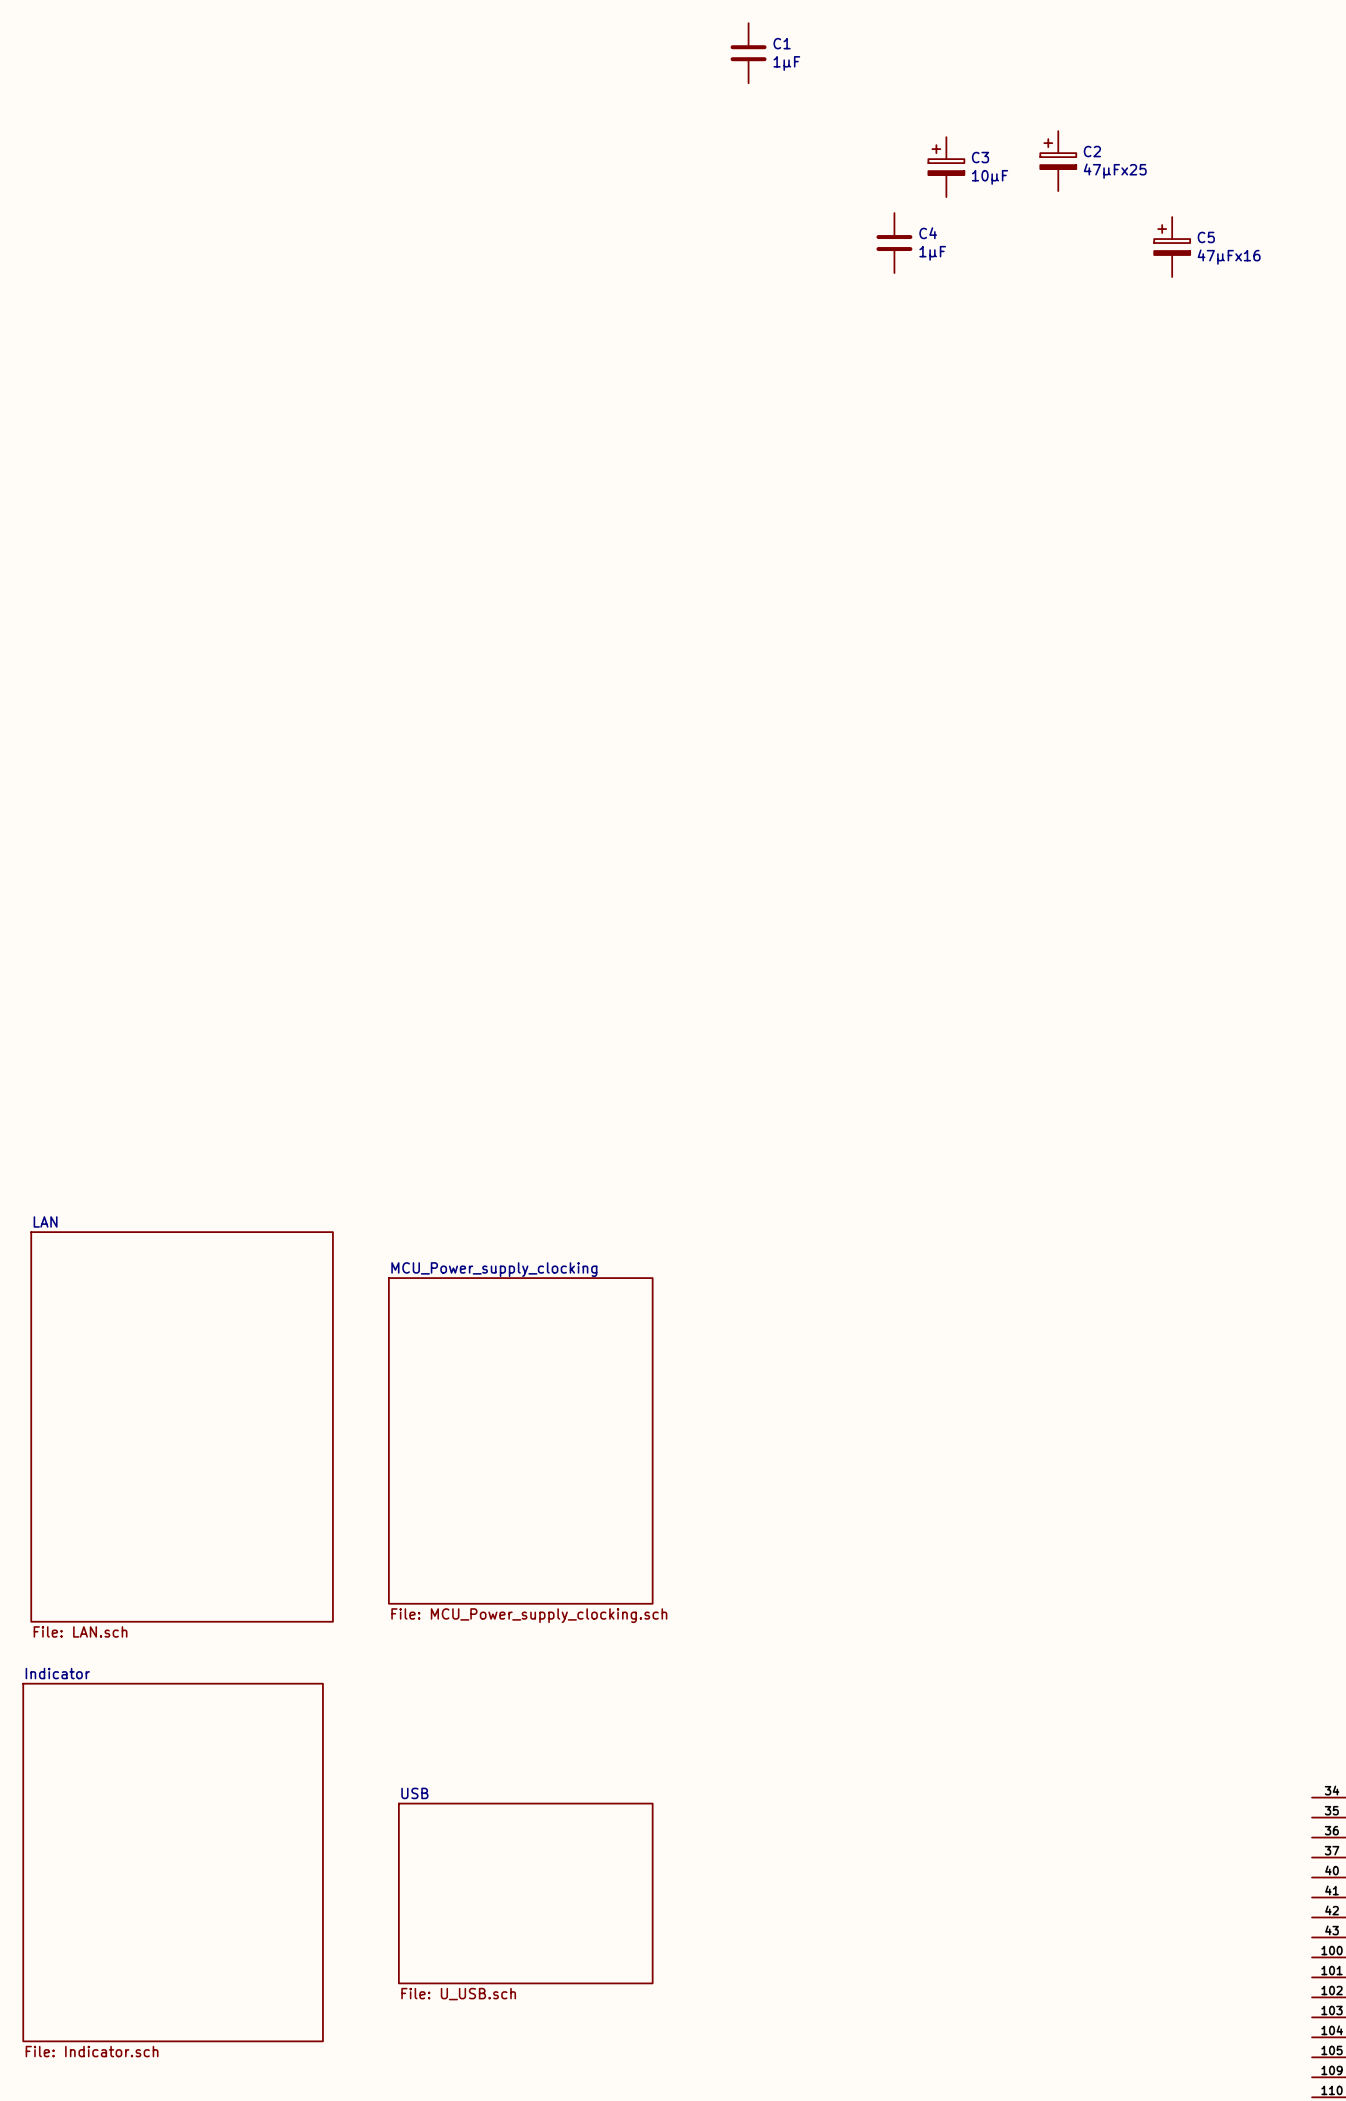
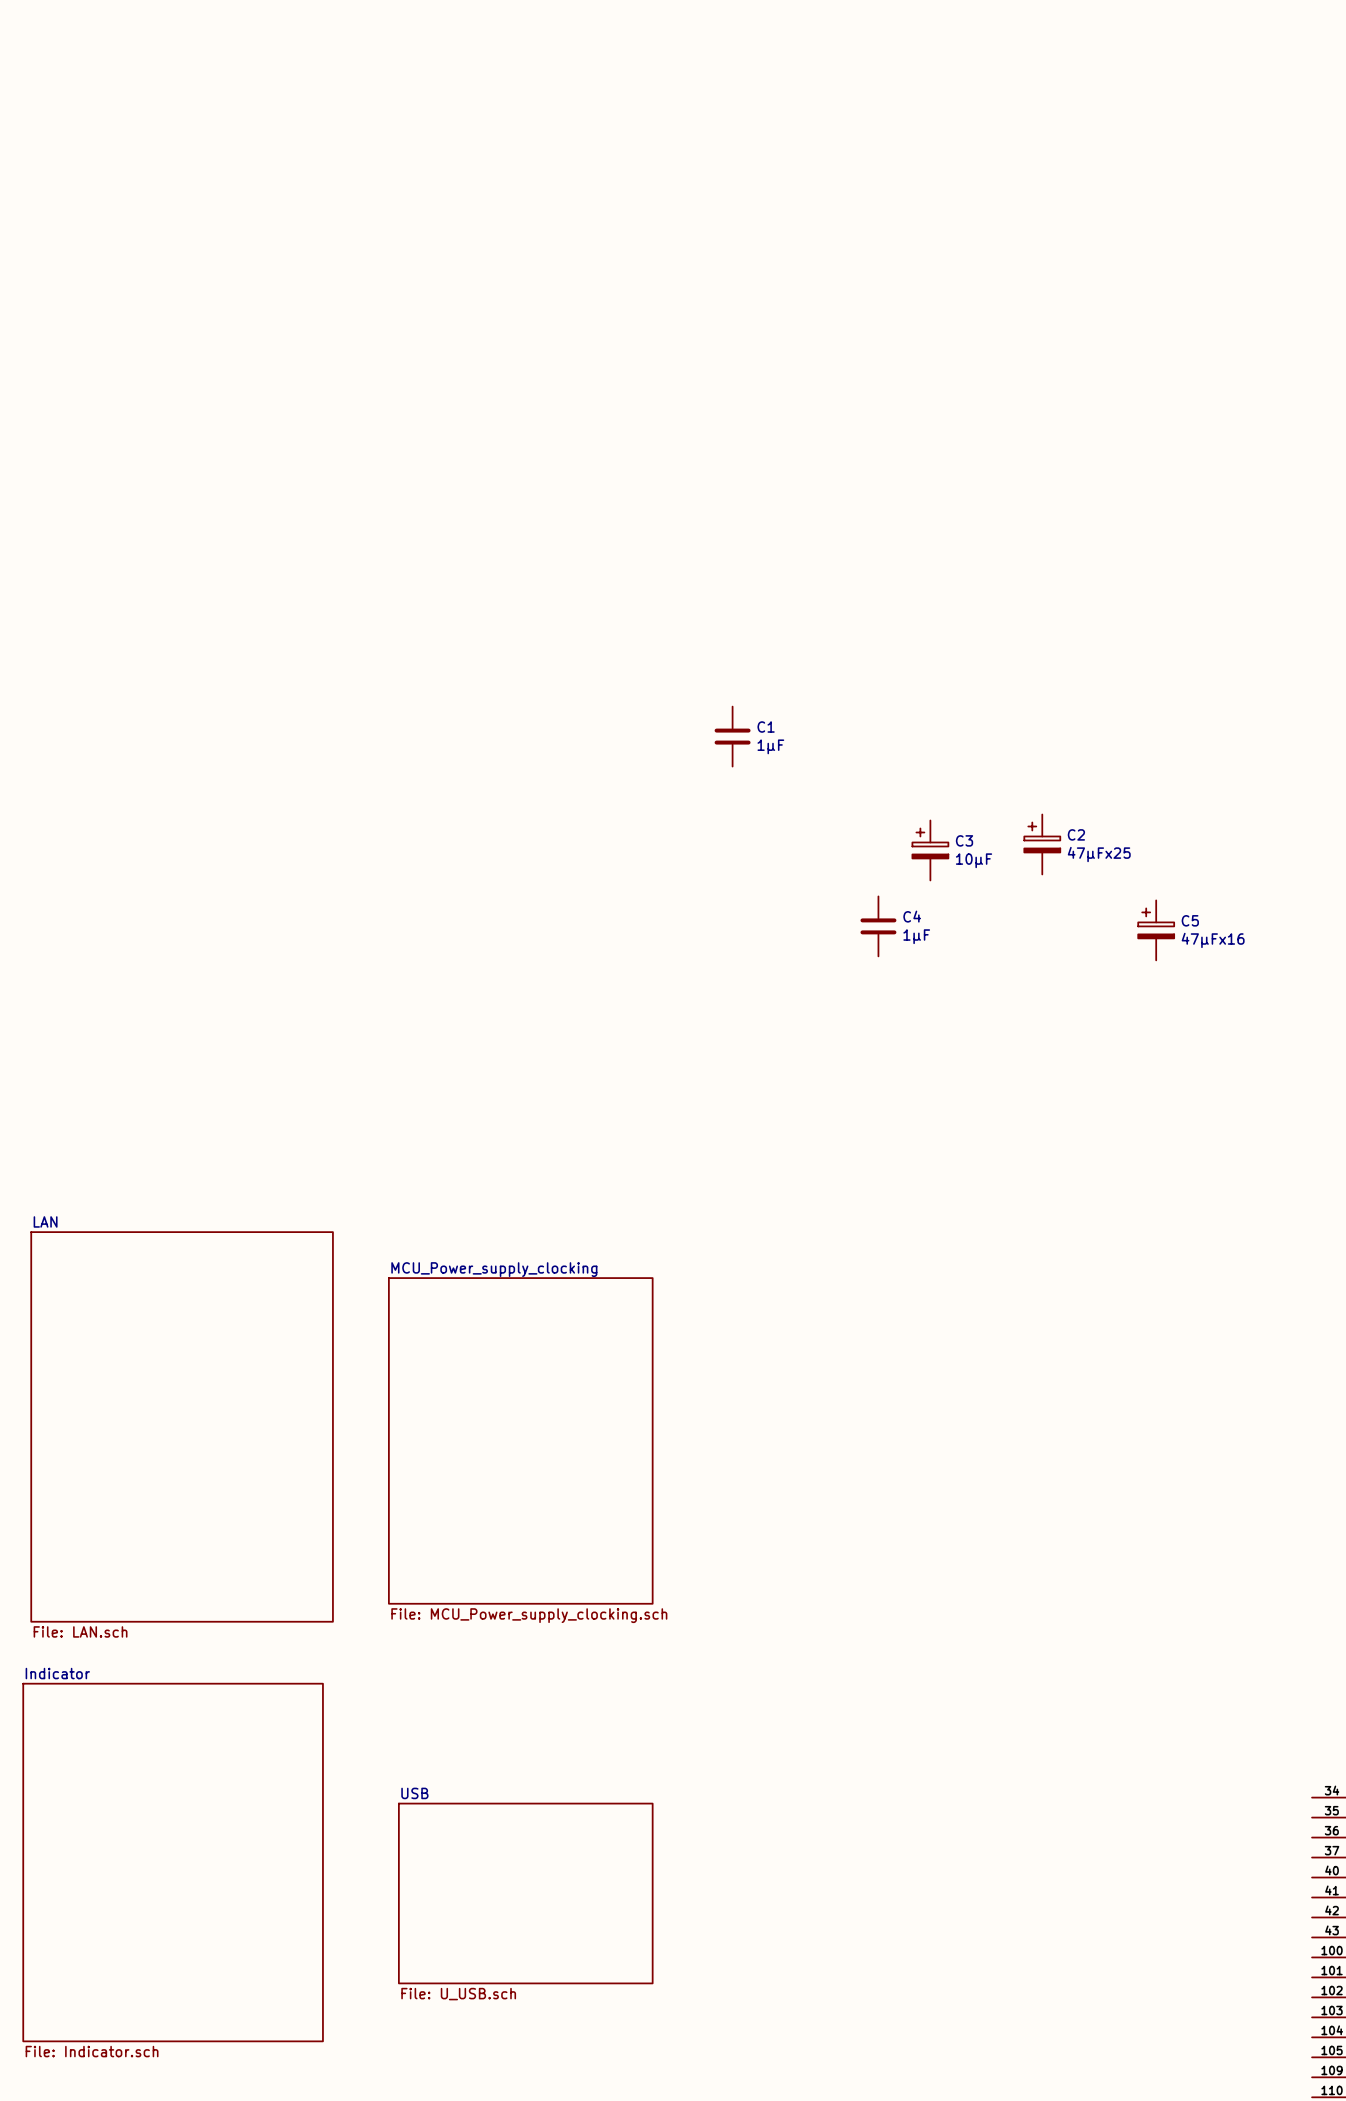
C1 position: (748, 53) -> (732, 736)
C2 position: (1058, 161) -> (1042, 844)
C3 position: (946, 167) -> (930, 850)
C4 position: (894, 243) -> (878, 926)
C5 position: (1172, 247) -> (1156, 930)

